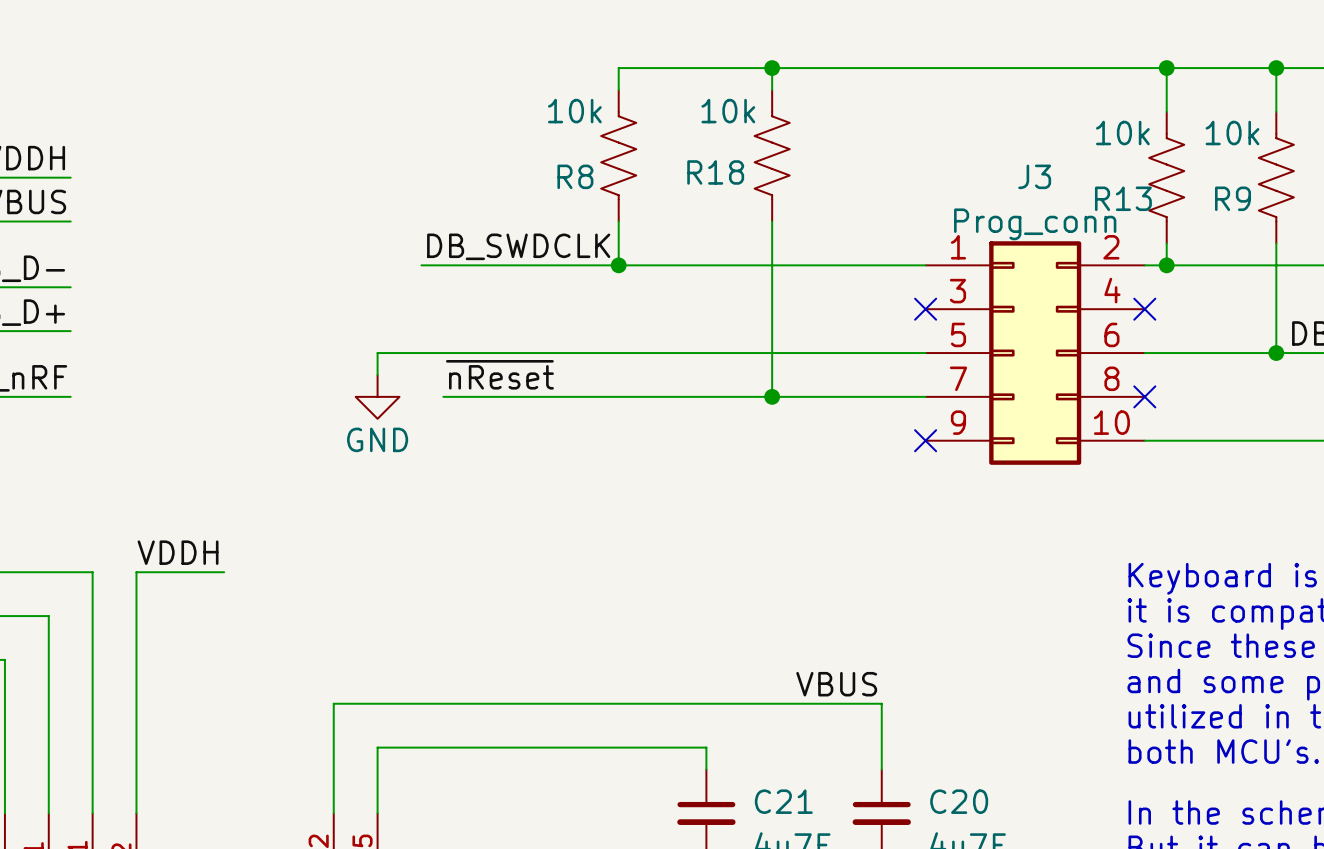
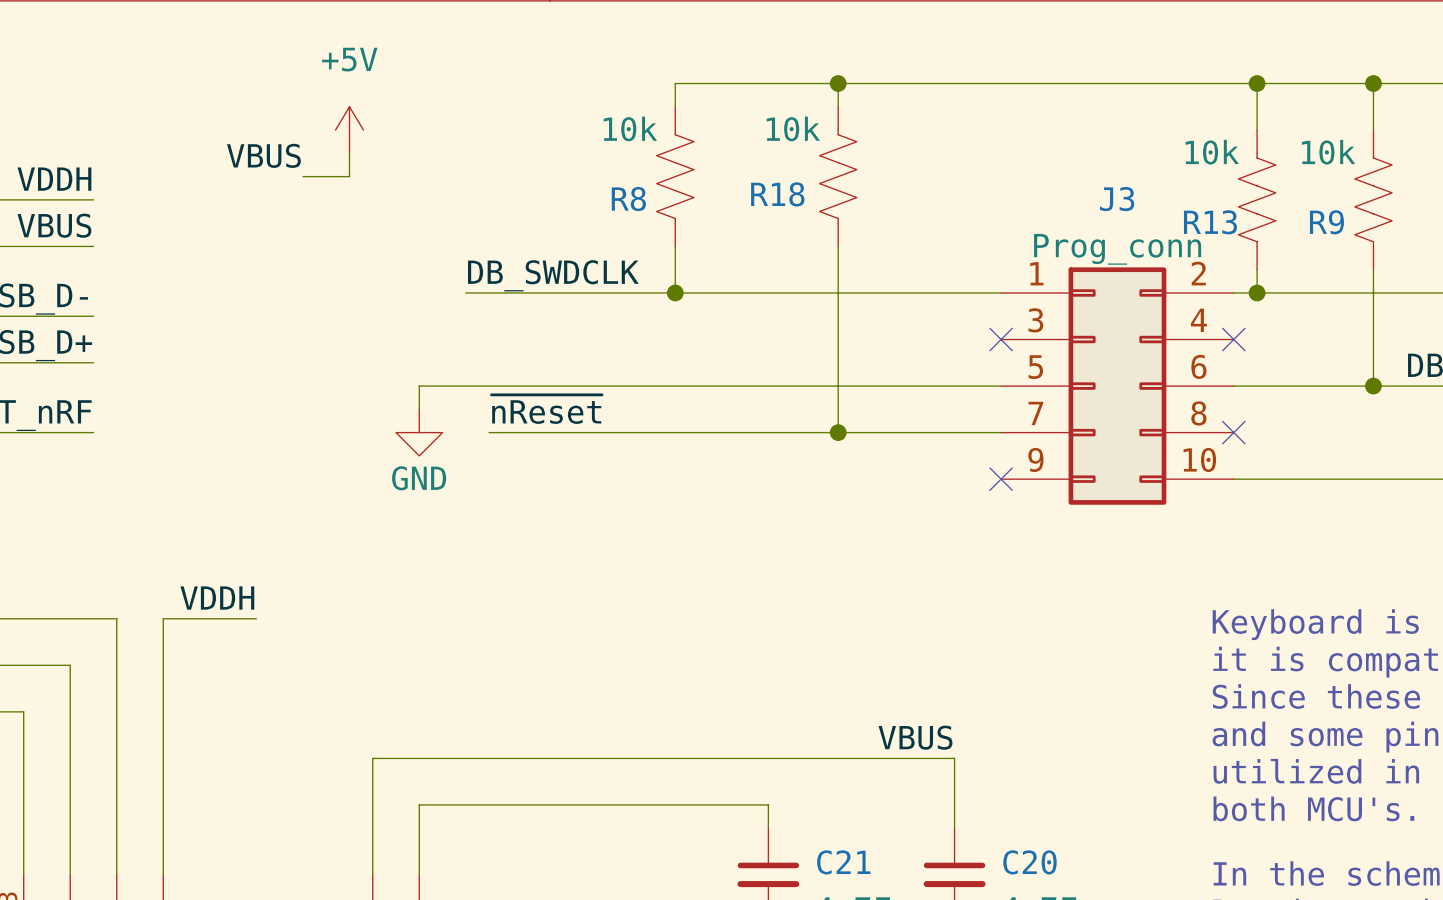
power symbol: none -> +5V (349, 130)
wire: none -> (349, 153) (349, 176) (302, 176)
label: none -> VBUS (263, 155)

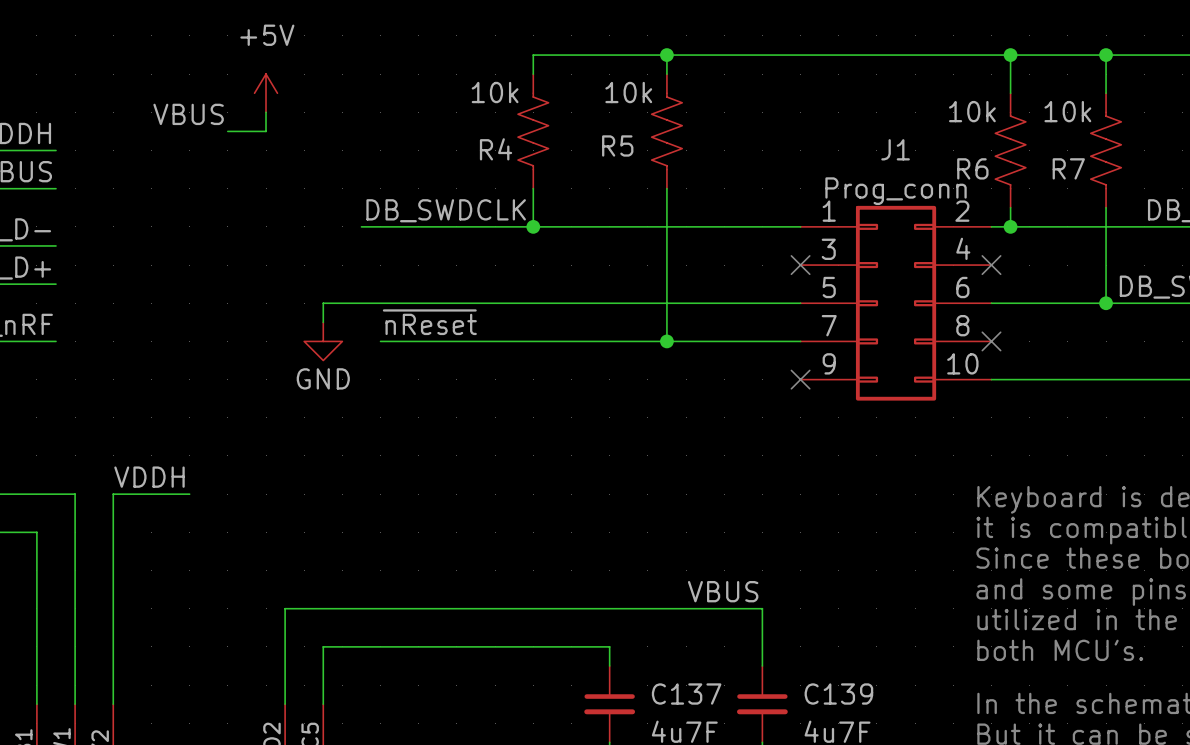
R18 name: R18 (777, 194) -> R5 (617, 145)
R8 name: R8 (628, 199) -> R4 (496, 149)
J3 name: J3 (1117, 199) -> J1 (895, 149)
R13 name: R13 (1210, 222) -> R6 (972, 168)
R9 name: R9 (1326, 222) -> R7 (1068, 168)
C21 name: C21 (843, 862) -> C137 (686, 694)
C20 name: C20 (1029, 862) -> C139 (838, 694)

